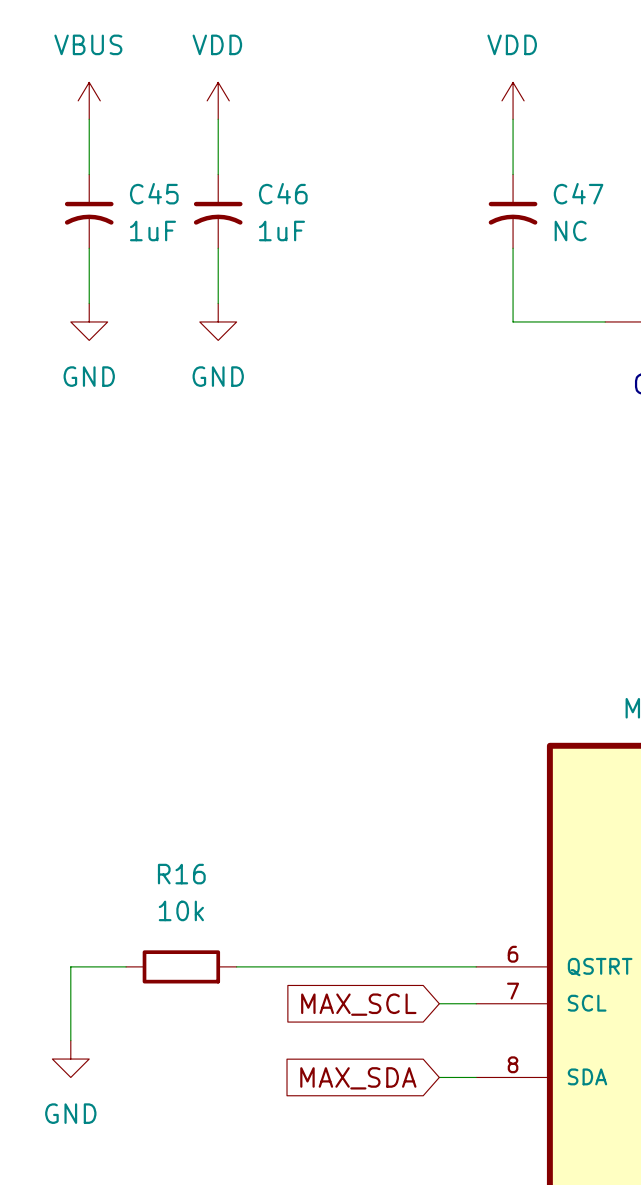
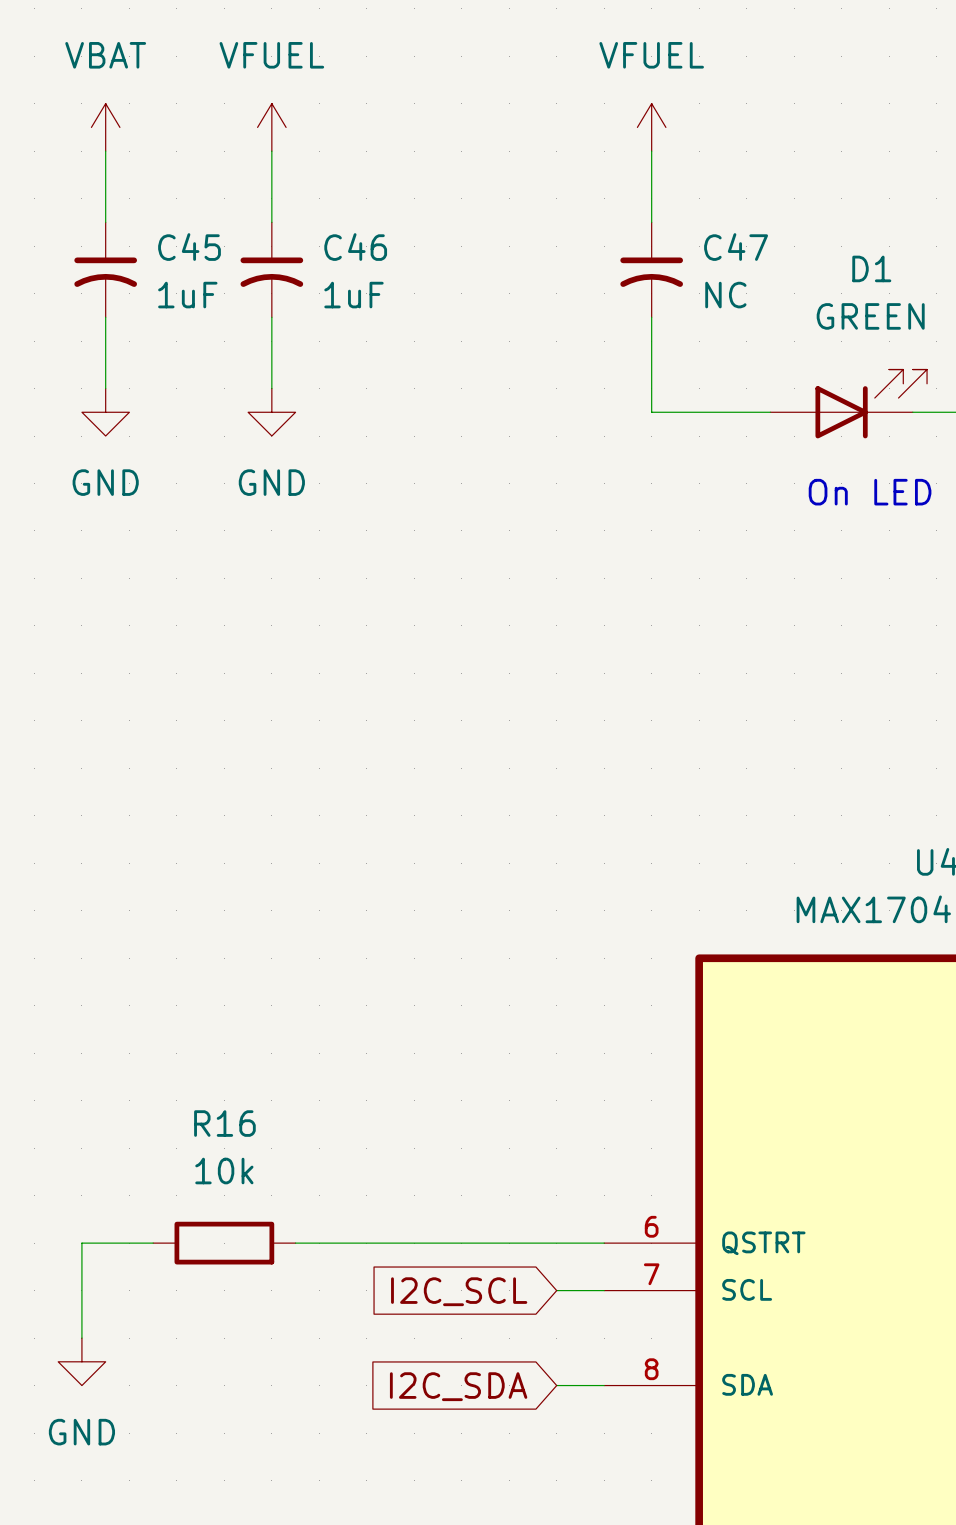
power symbol: VBUS (89, 100) -> VBAT (105, 127)
power symbol: VDD (218, 100) -> VFUEL (271, 127)
power symbol: VDD (513, 100) -> VFUEL (651, 127)
global label: MAX_SCL (358, 1004) -> I2C_SCL (459, 1291)
global label: MAX_SDA (358, 1078) -> I2C_SDA (458, 1386)

